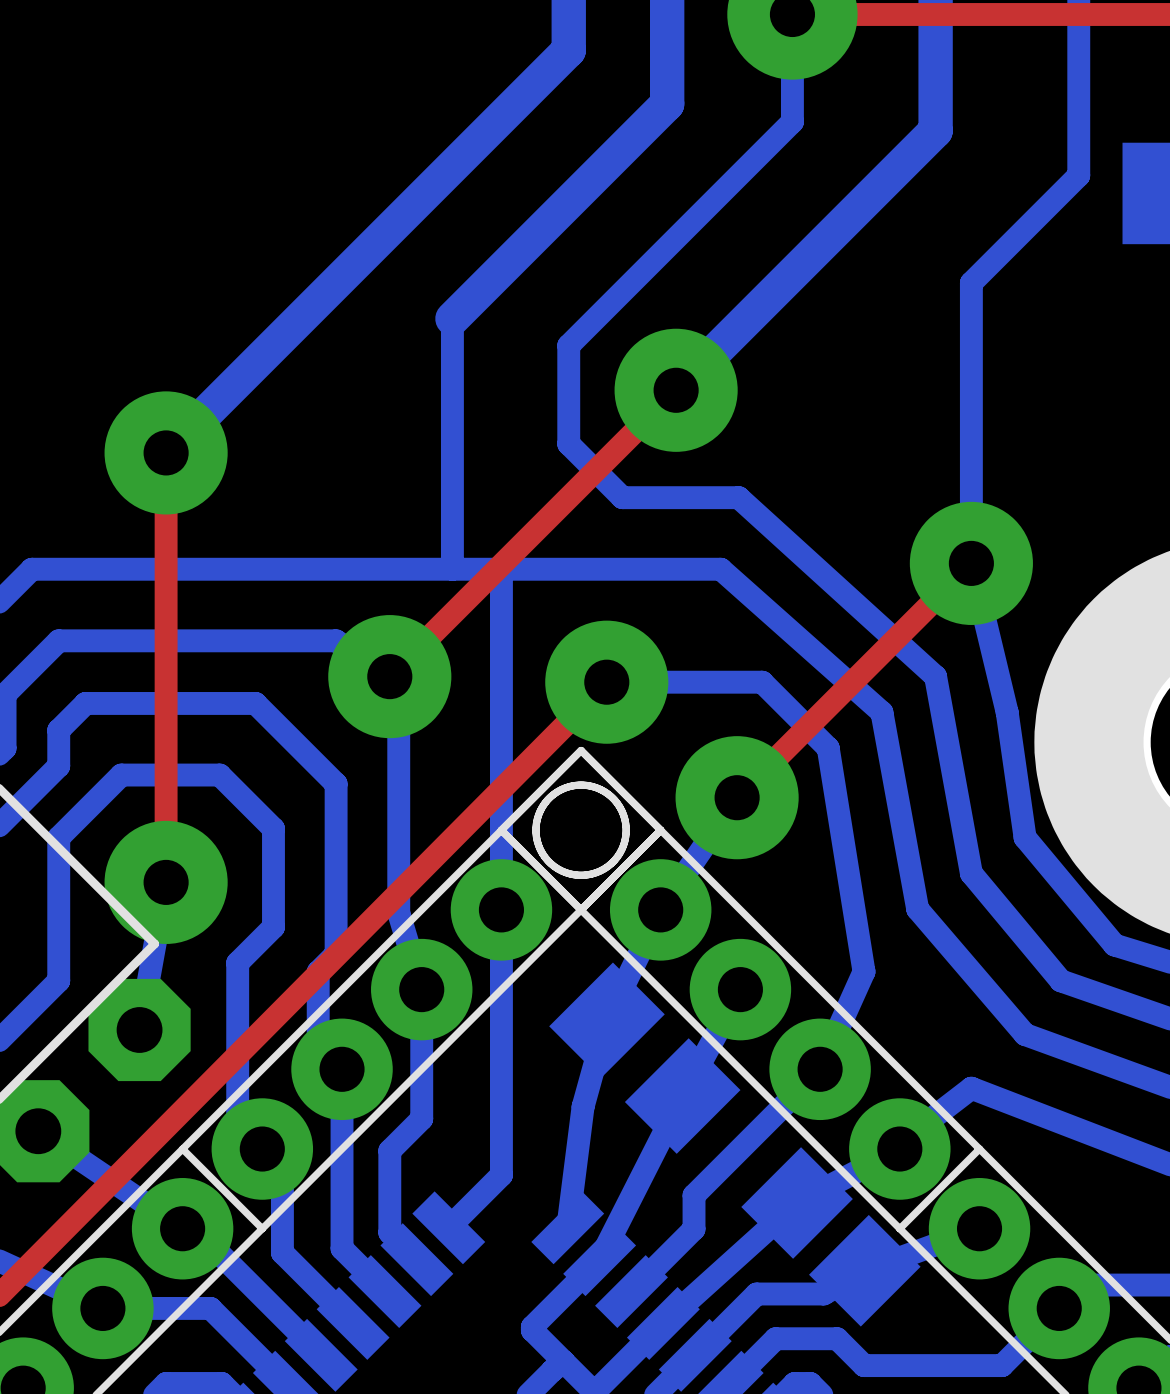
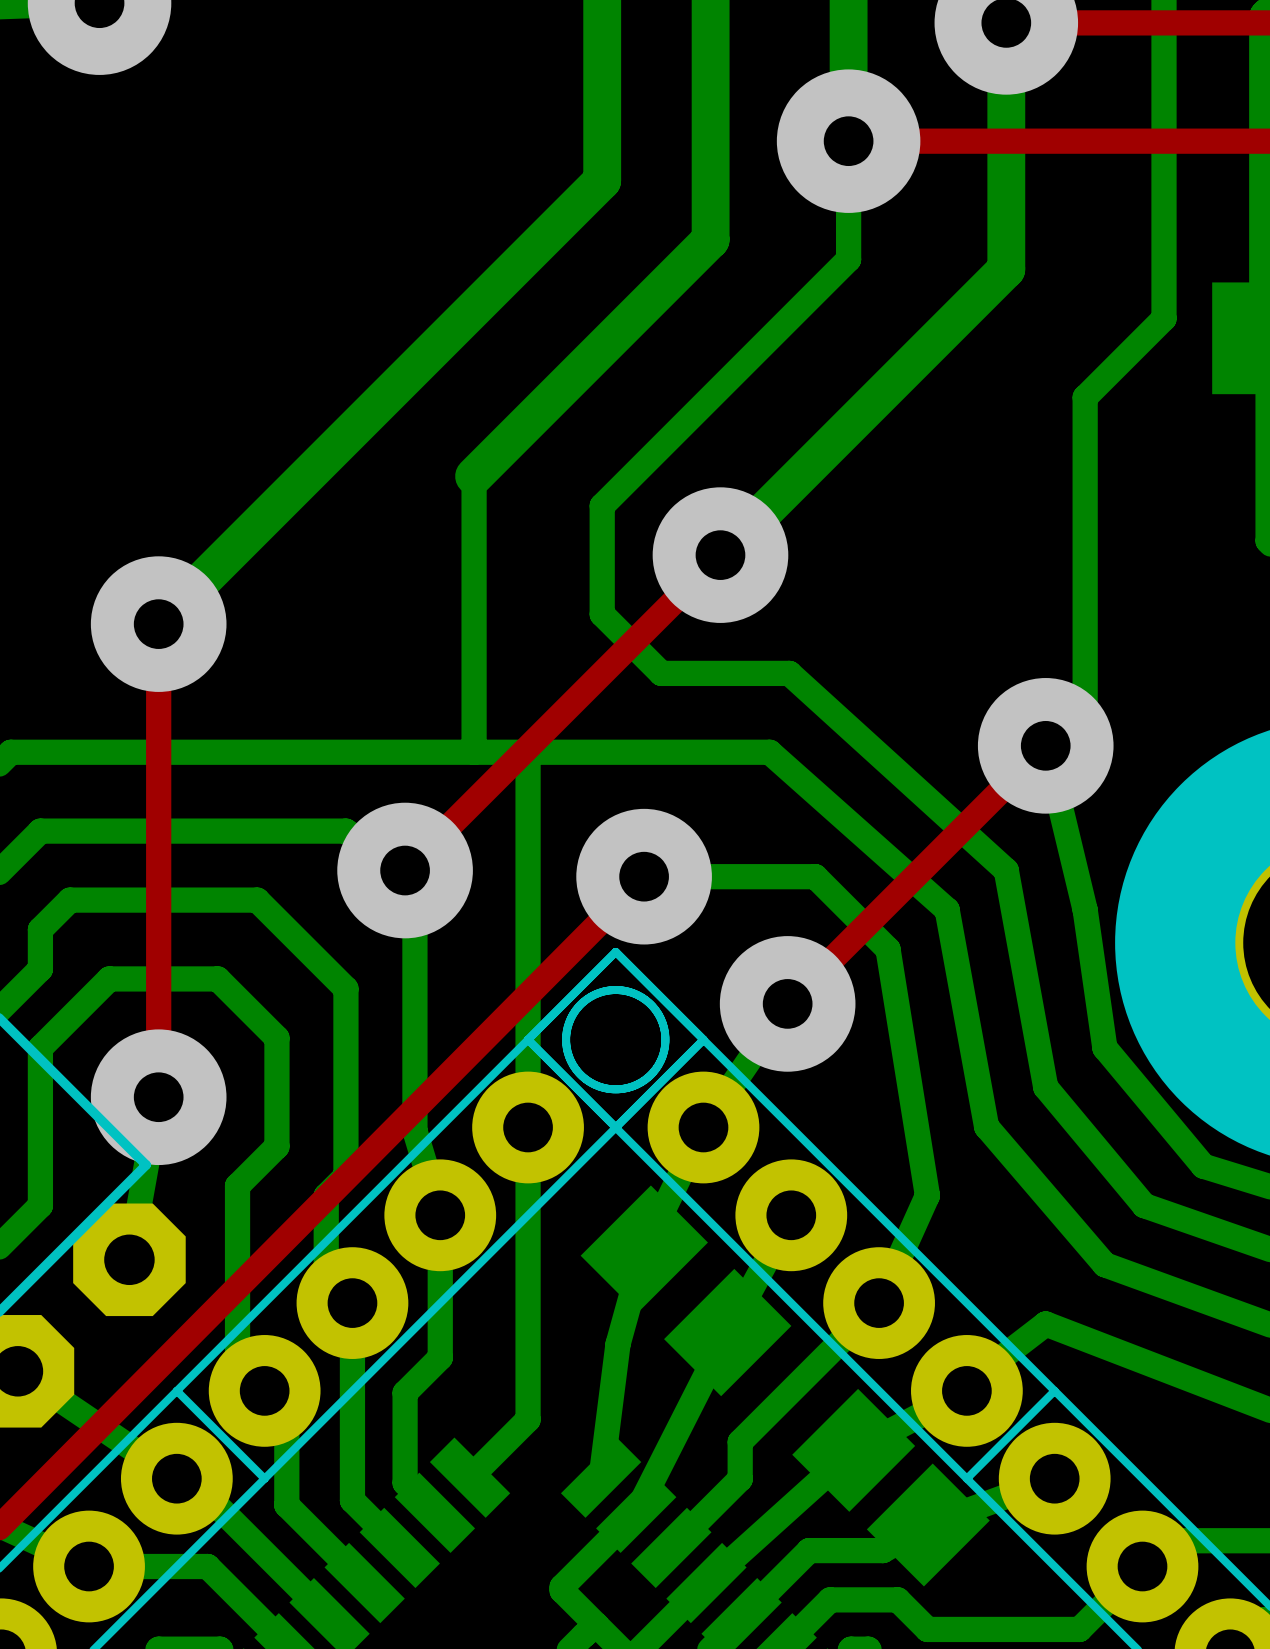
bottom track: (1007, 247) (971, 282) (971, 563) -> (1085, 397) (1085, 706) (1045, 745)

